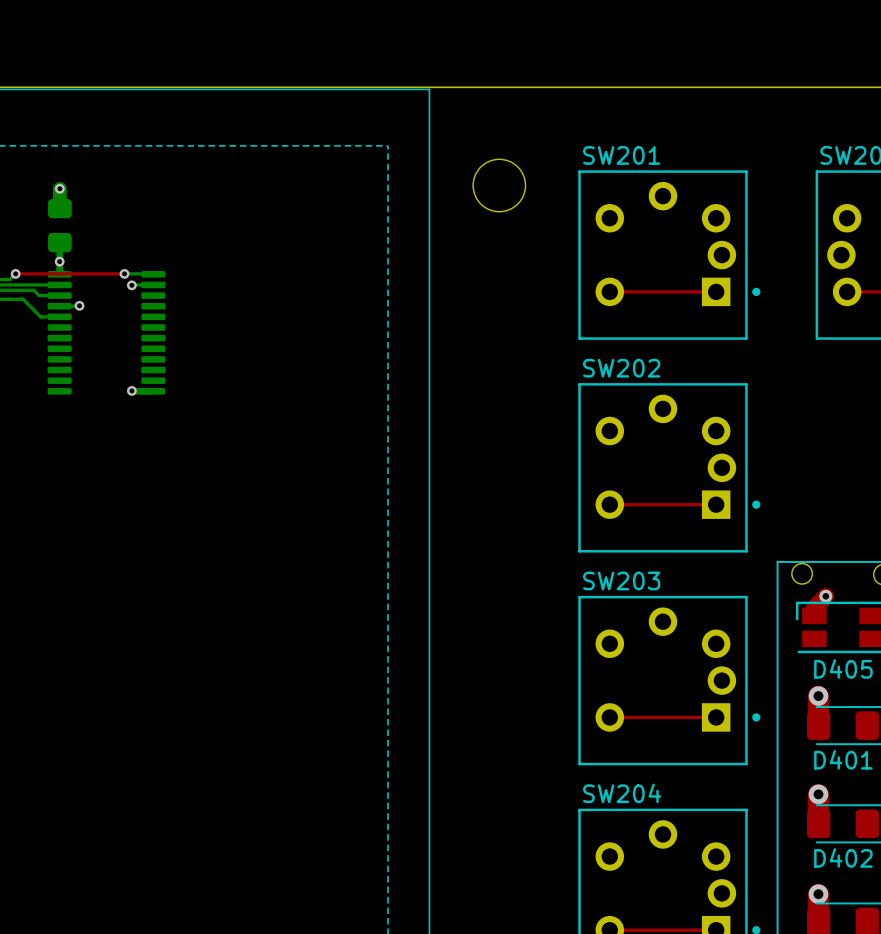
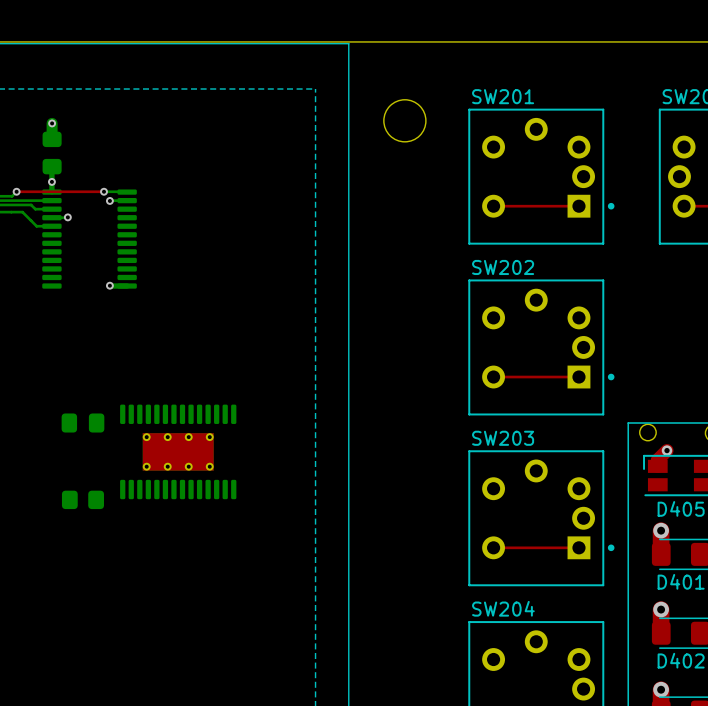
part: none -> (82, 423)
part: none -> (178, 451)
part: none -> (82, 499)

